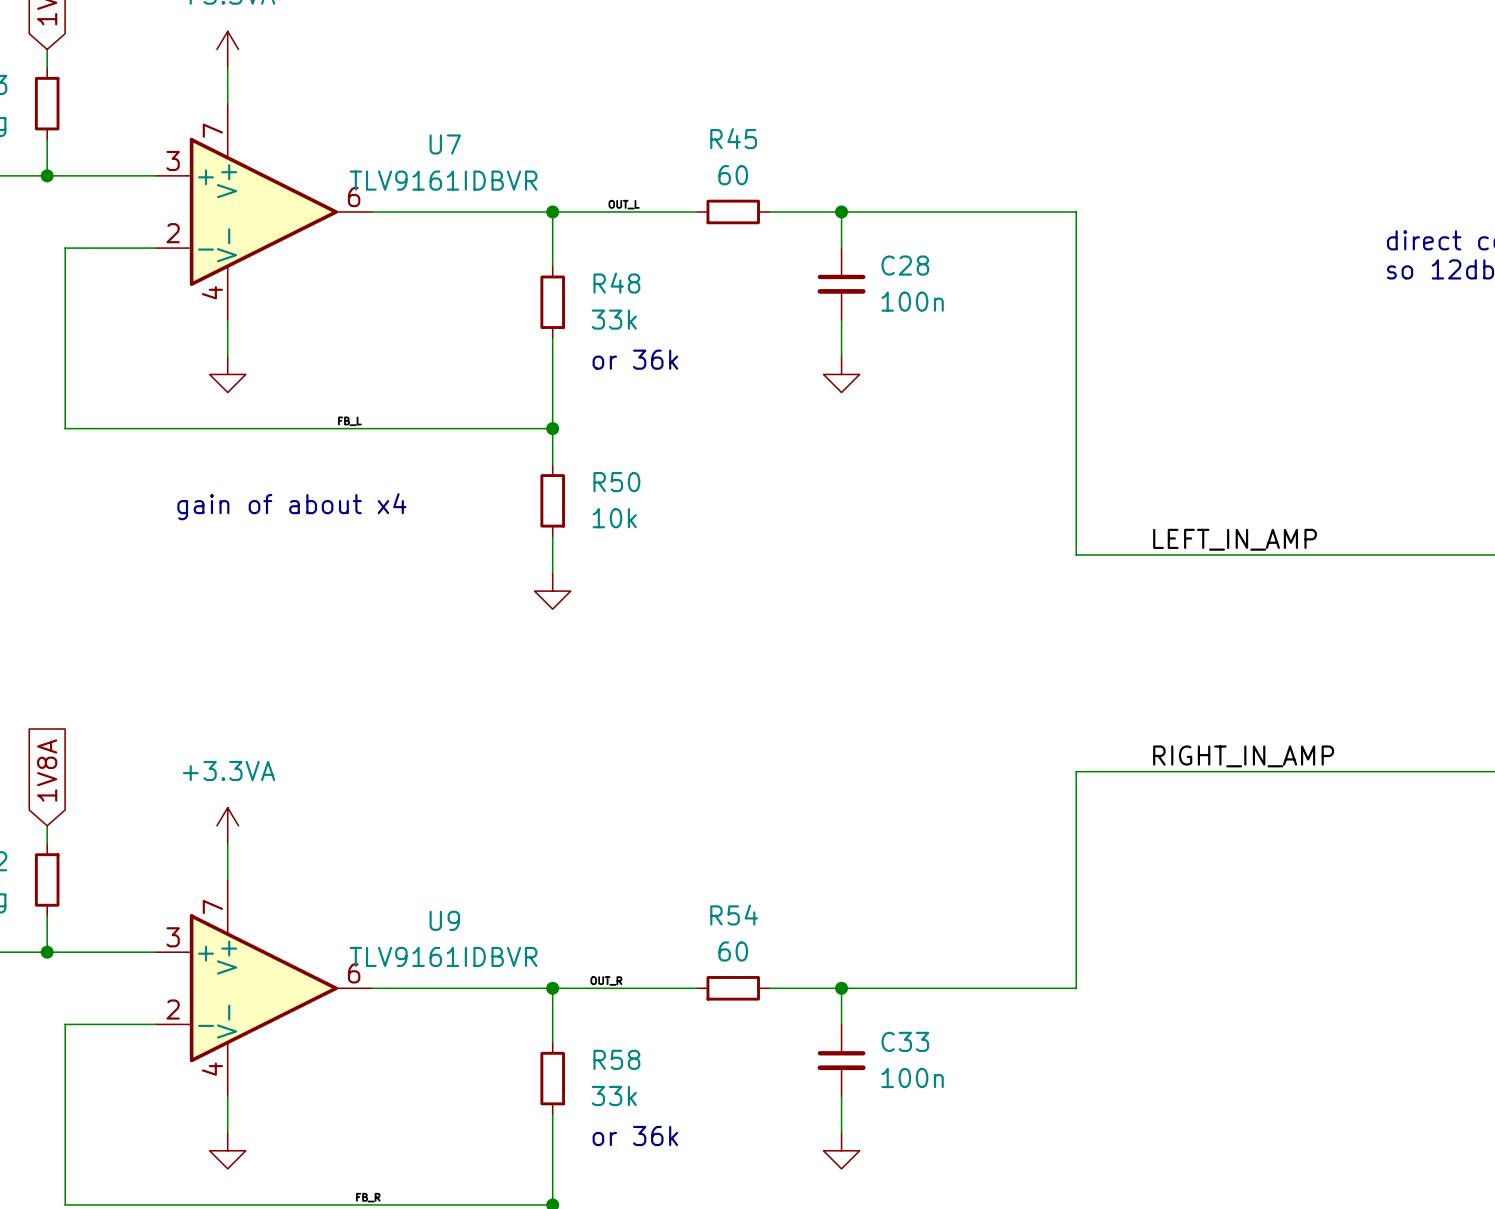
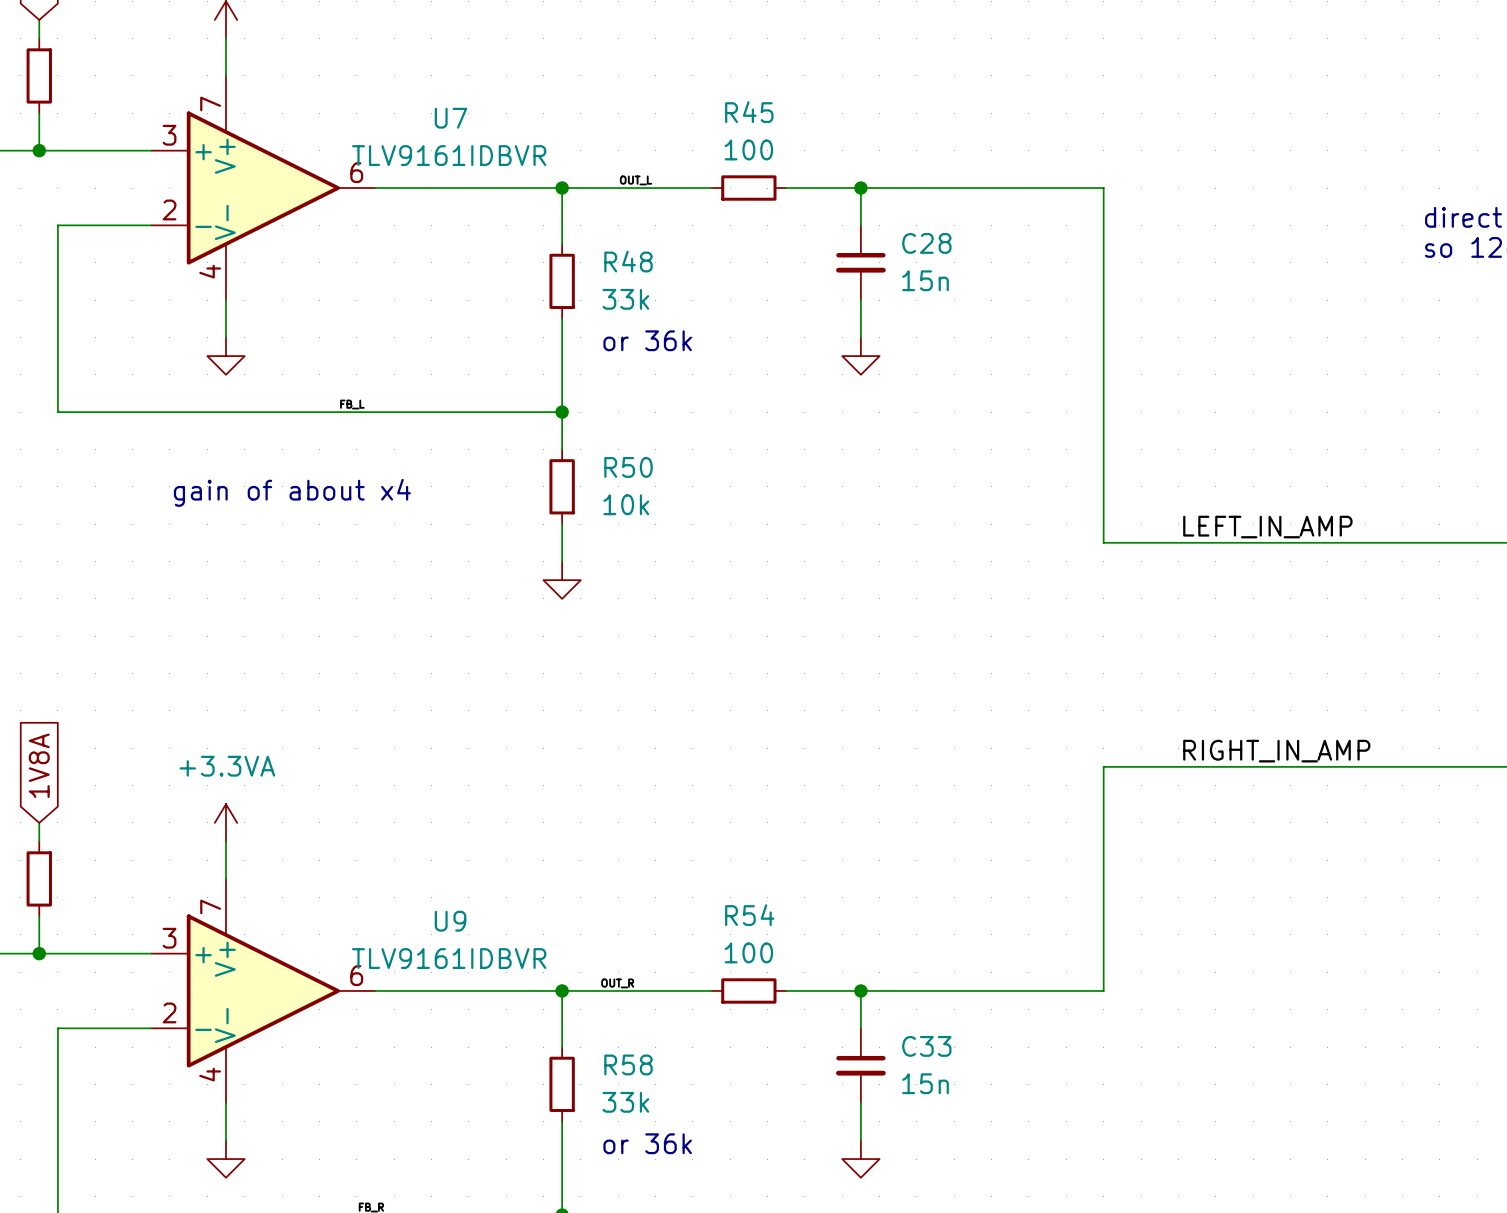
R45 value: 60 (733, 175) -> 100 (748, 149)
C28 value: 100n (912, 301) -> 15n (925, 280)
R54 value: 60 (733, 951) -> 100 (748, 952)
C33 value: 100n (912, 1077) -> 15n (925, 1083)

